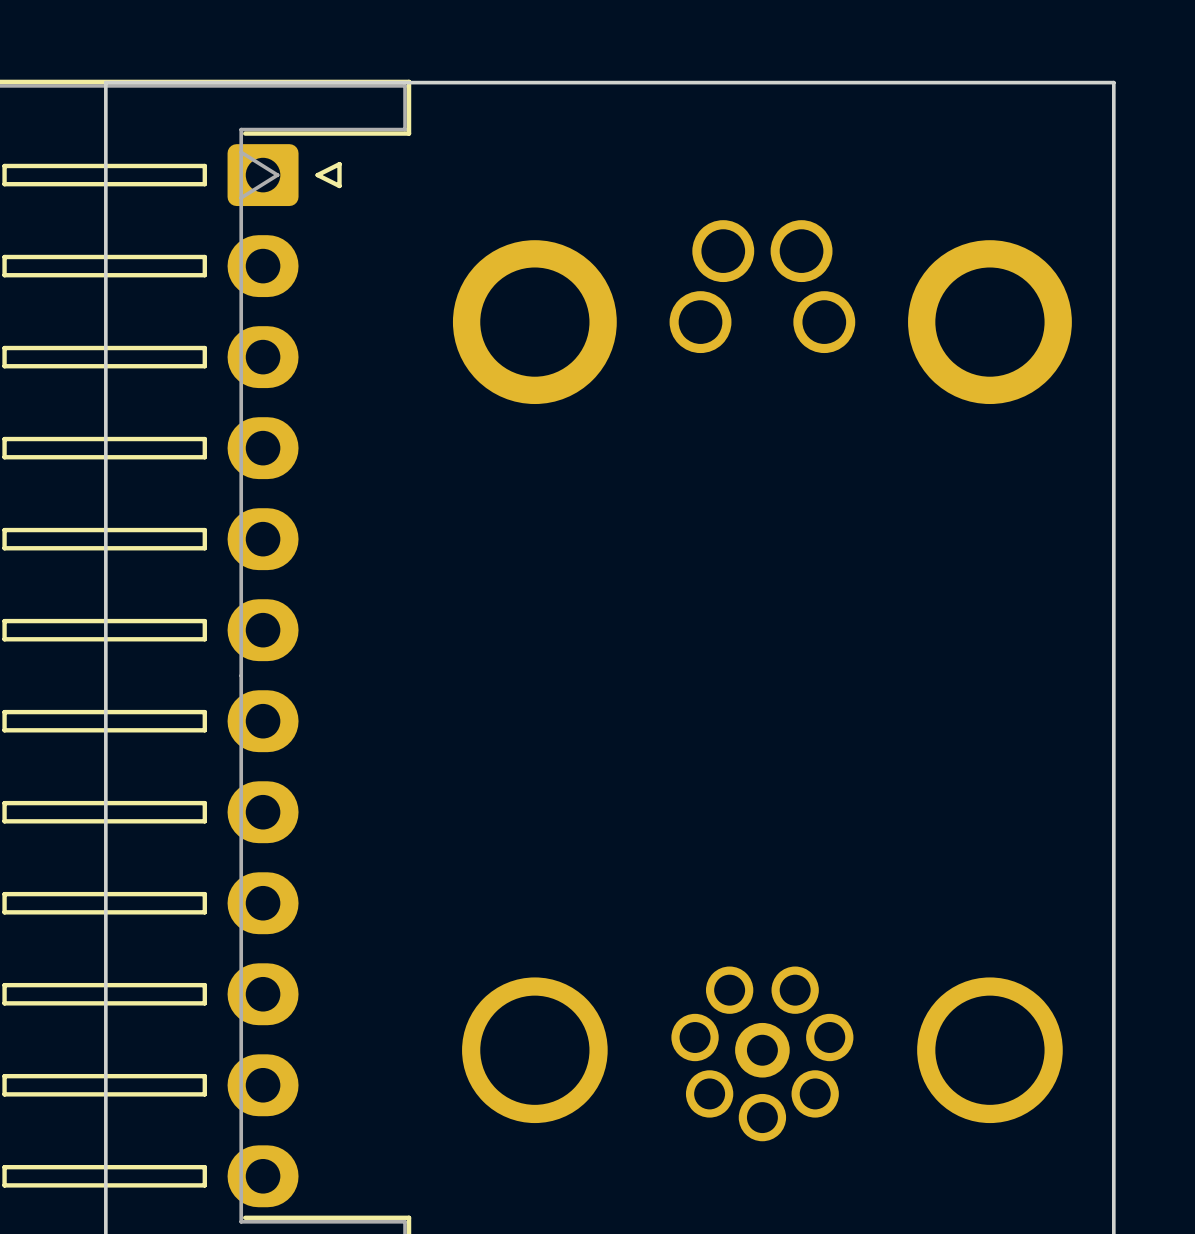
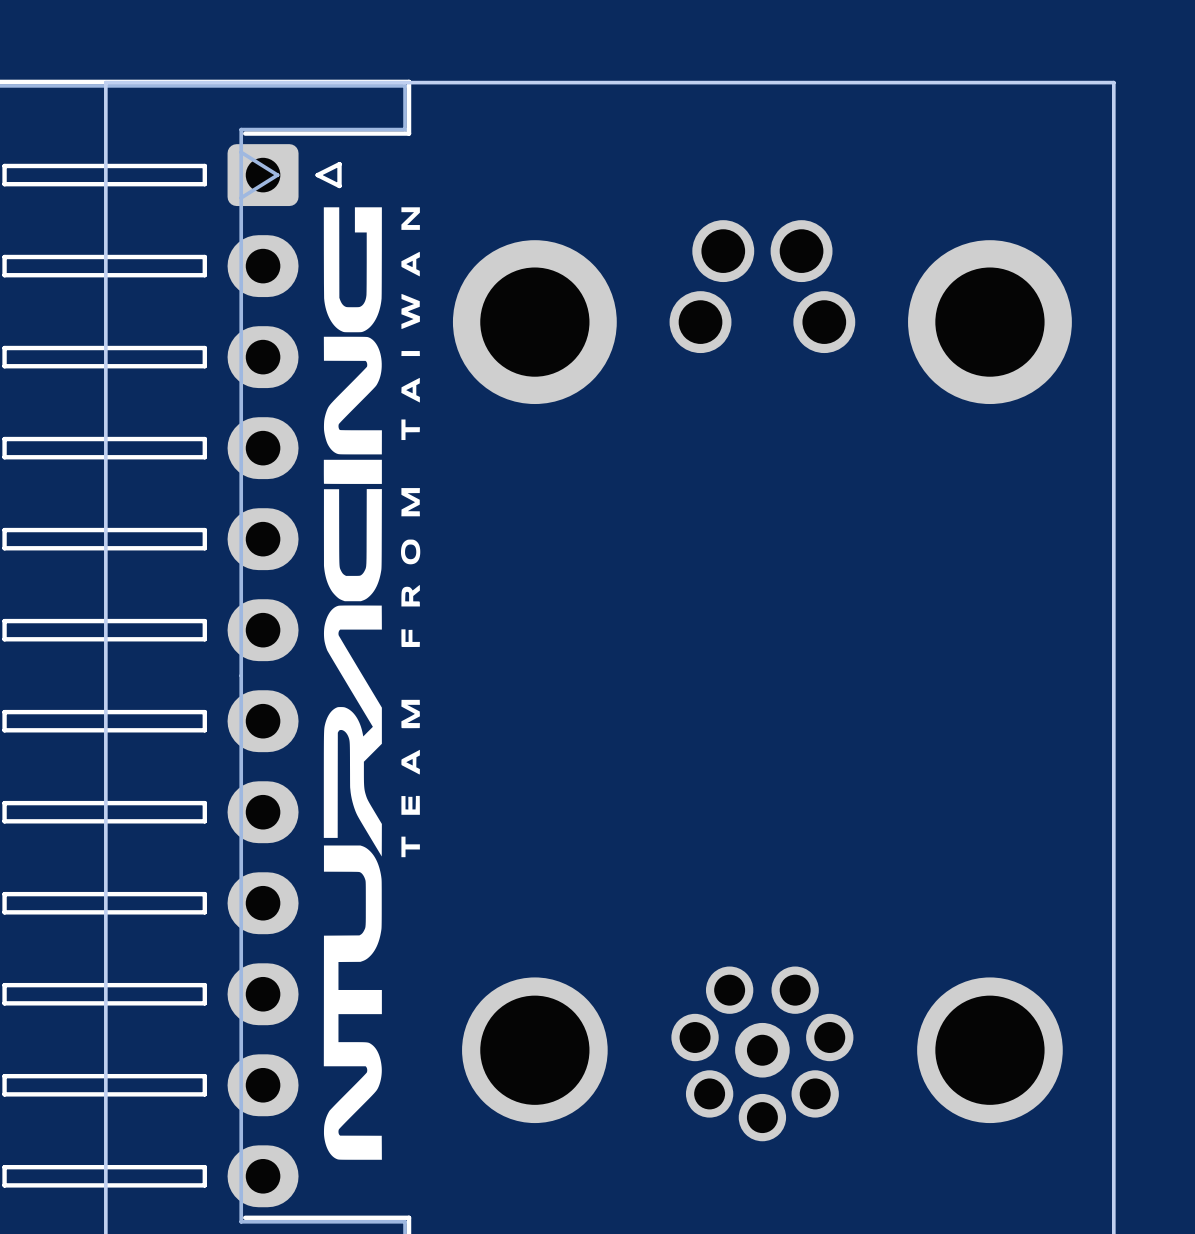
drawing: none -> [323, 207, 421, 1160]

